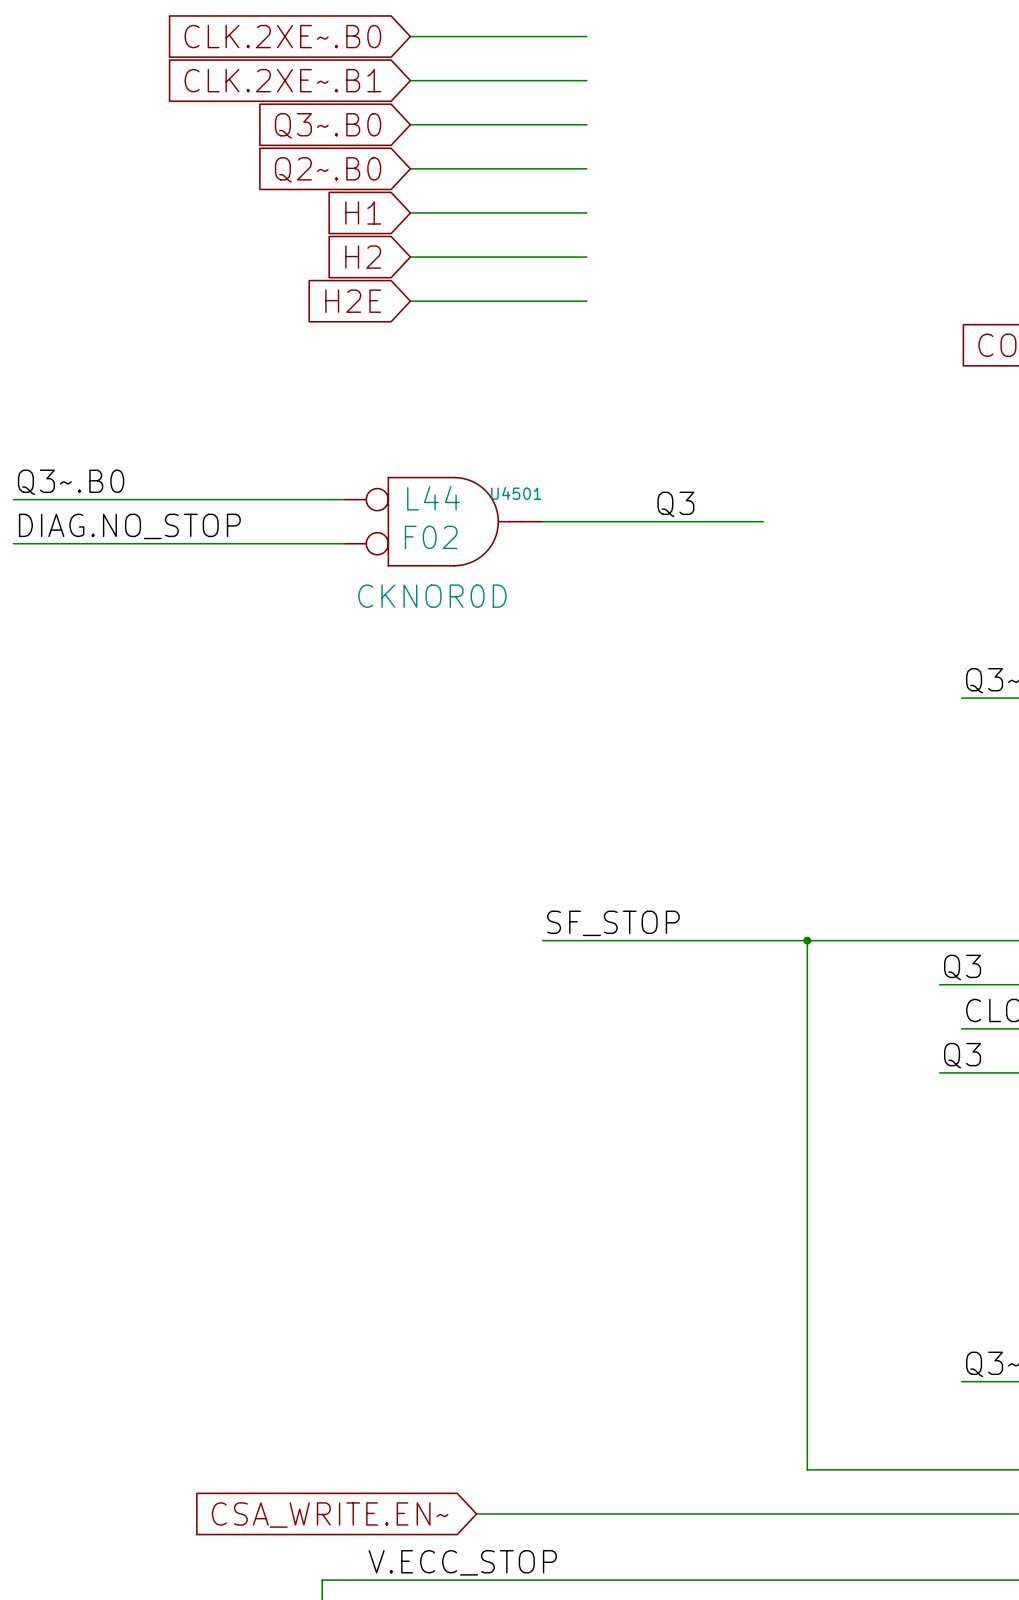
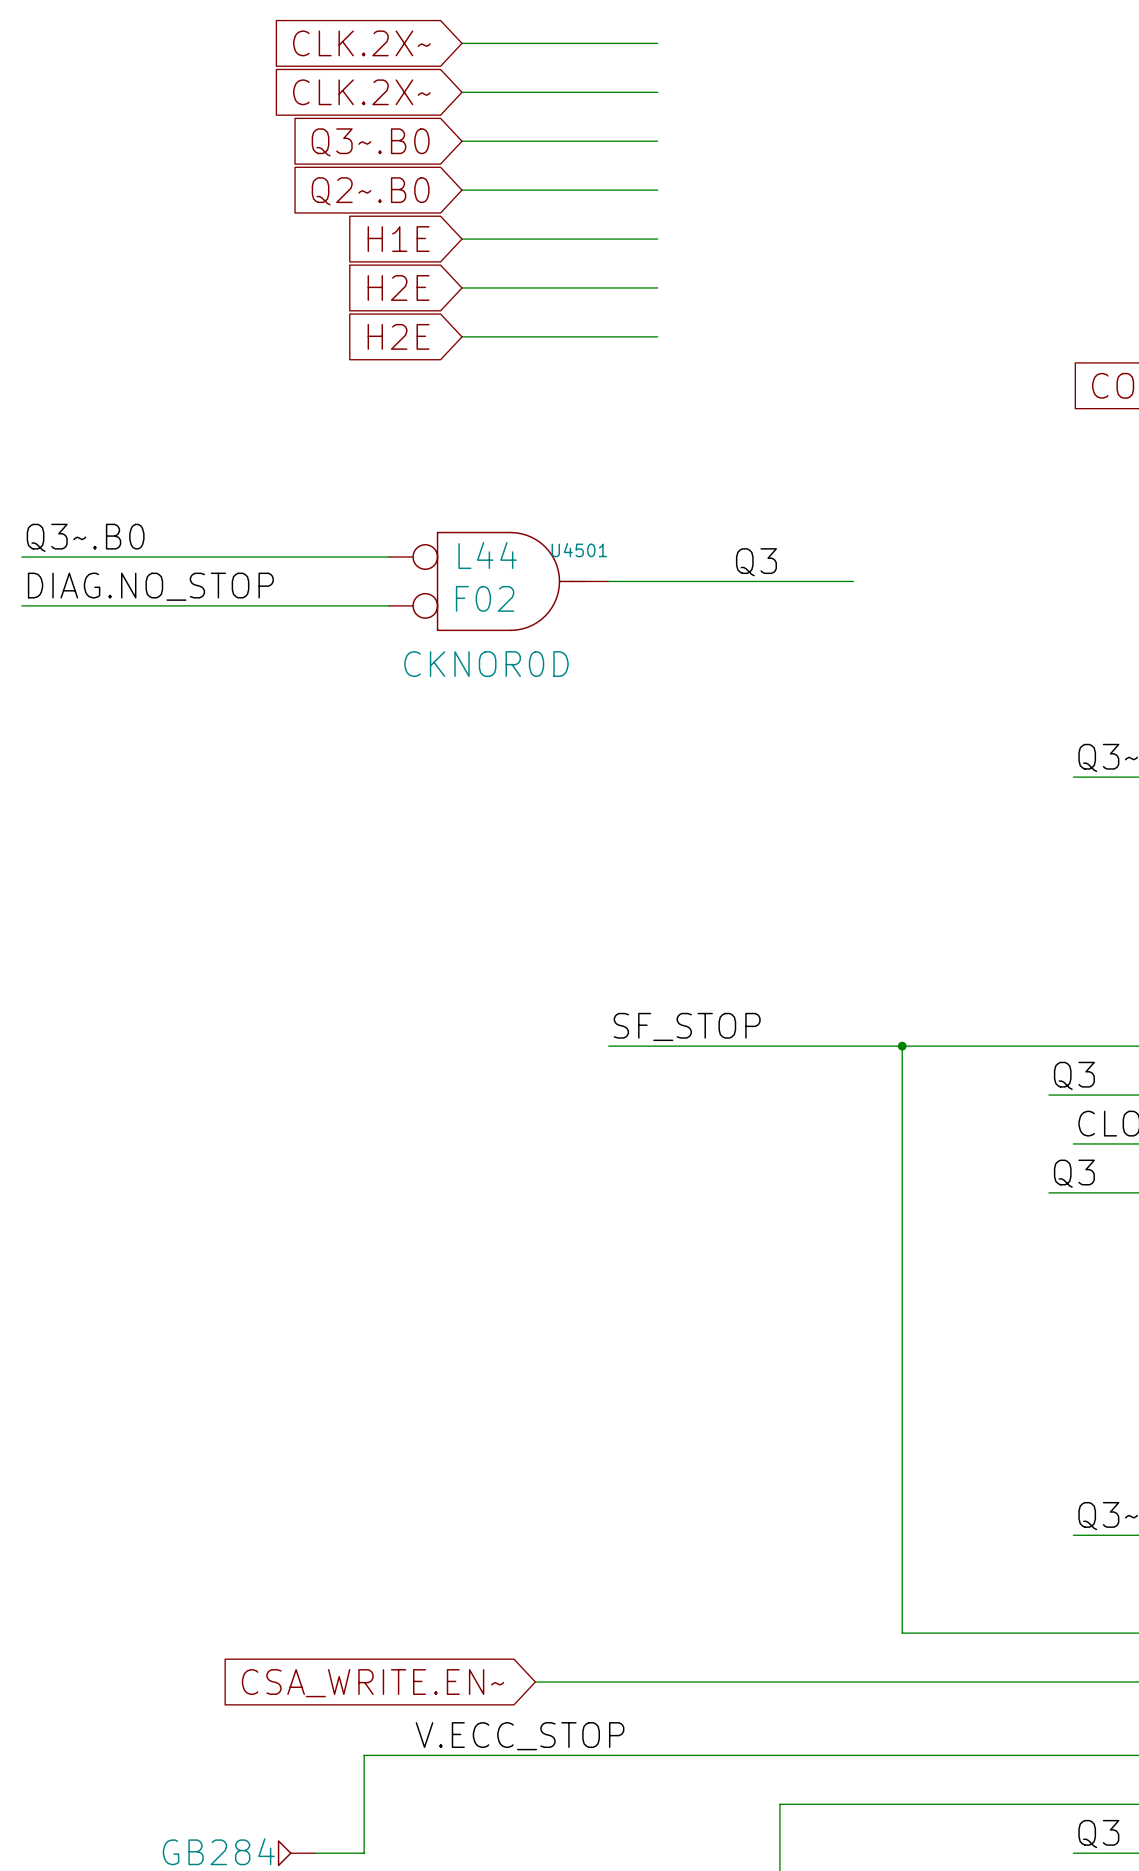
global label: CLK.2XE~.B0 (282, 36) -> CLK.2X~ (361, 43)
global label: CLK.2XE~.B1 (282, 80) -> CLK.2X~ (361, 92)
global label: H1 (363, 212) -> H1E (398, 239)
global label: H2 (363, 257) -> H2E (398, 287)

